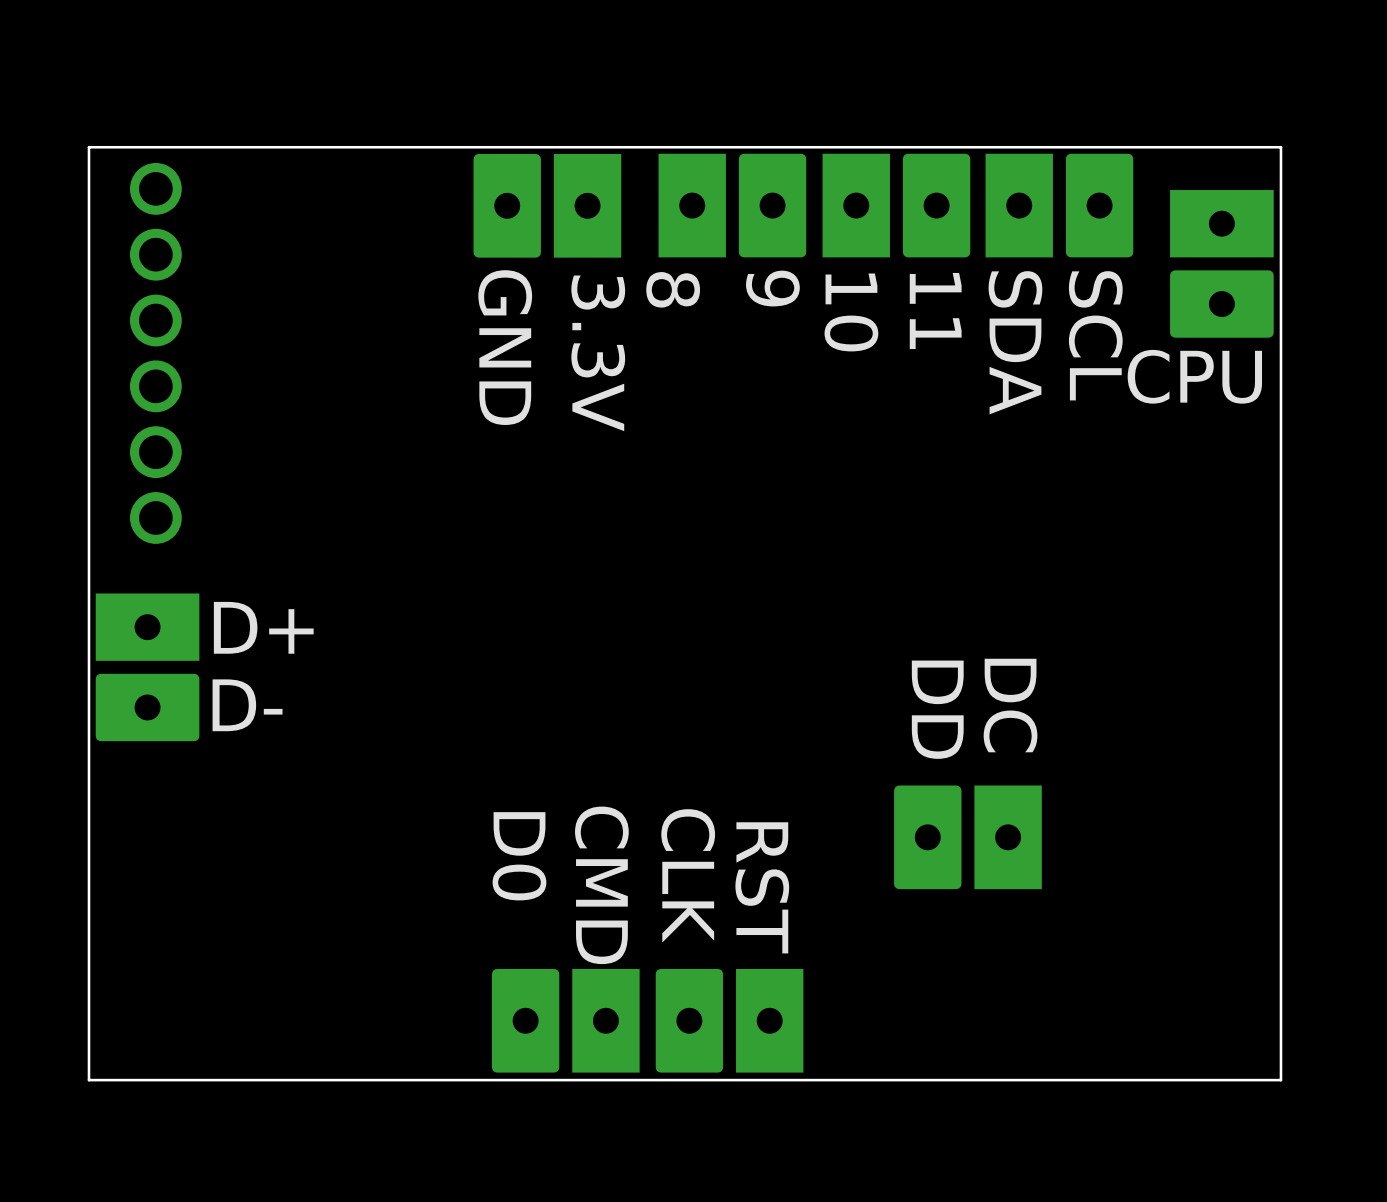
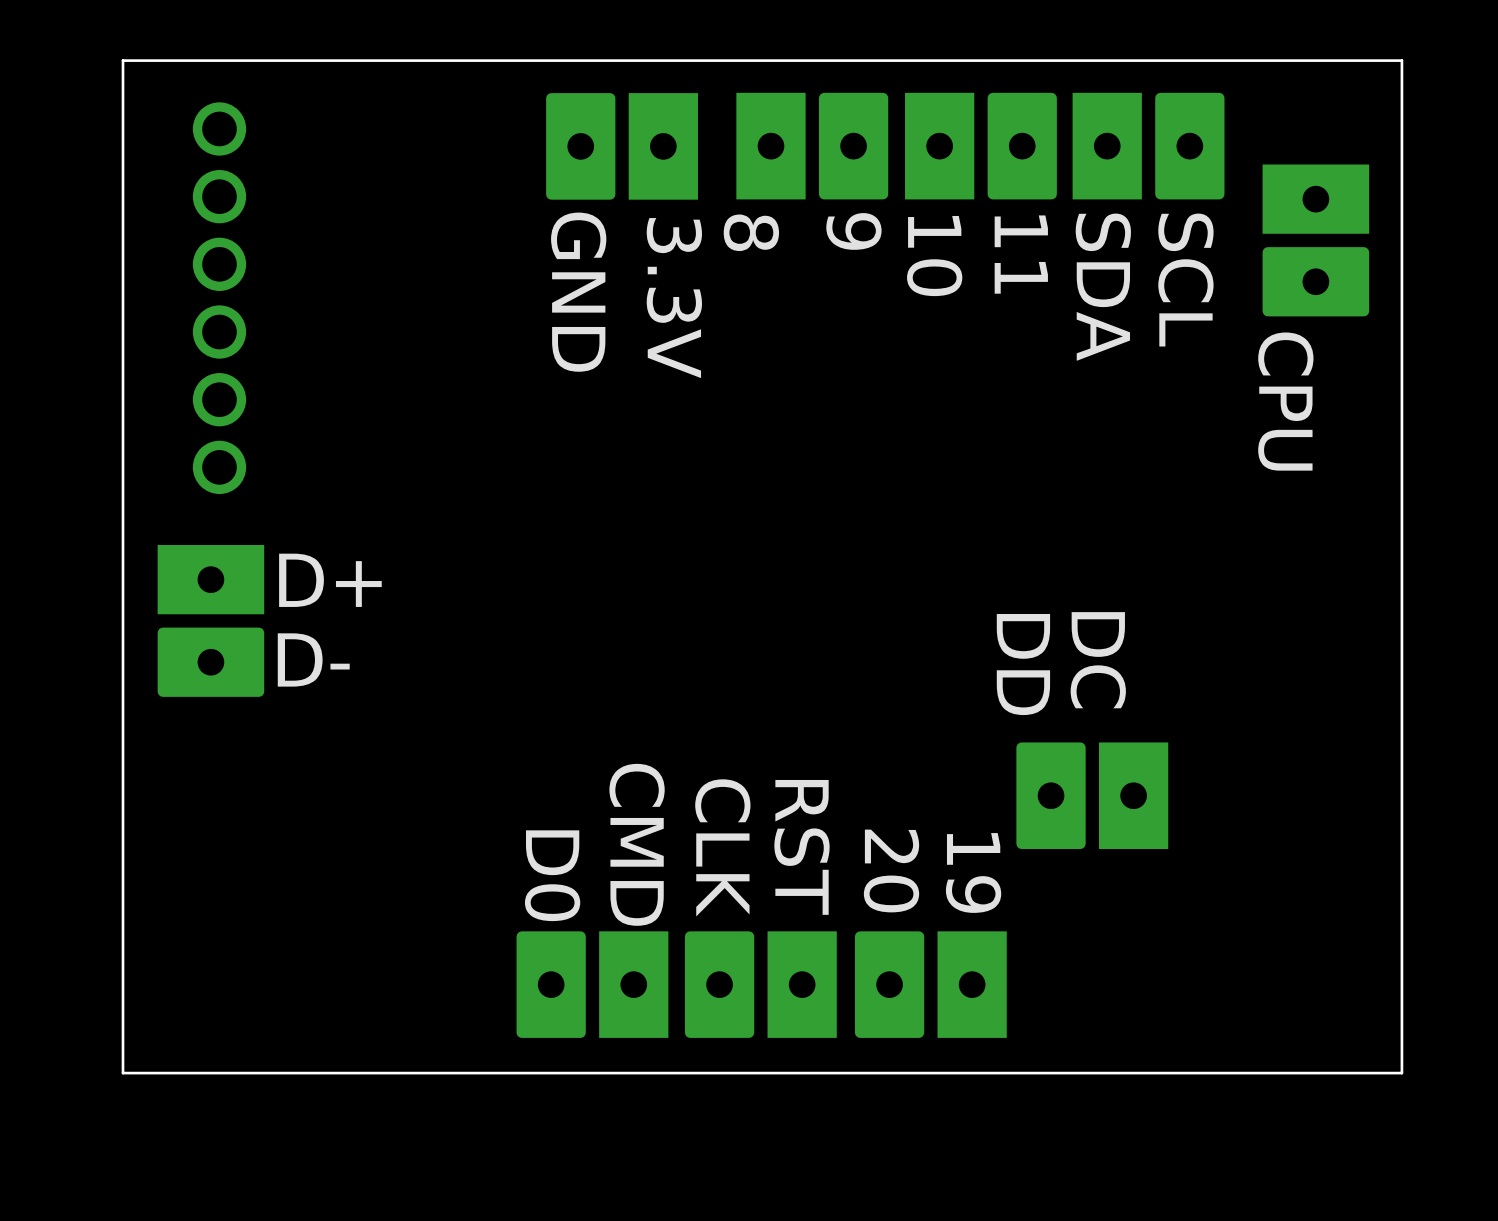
board edge: (1280, 147) (88, 147) (88, 1080) (1280, 1080) (1280, 147) -> (1401, 60) (1401, 1073) (122, 1073) (122, 60) (1401, 60)
part position: (1221, 263) -> (1315, 240)
text rotation: 0° (1194, 376) -> 90° clockwise (1285, 401)
part position: (967, 837) -> (1092, 795)
text position: D0 (519, 856) -> D0 (552, 875)
text position: CLK (688, 875) -> CLK (722, 847)
text position: CMD (601, 885) -> CMD (637, 844)
text position: RST (762, 887) -> RST (801, 847)
text: none -> 20 (891, 870)
text: none -> 19 (973, 872)
part position: (565, 1020) -> (592, 984)
part position: (729, 1020) -> (760, 984)
part: none -> (930, 984)

